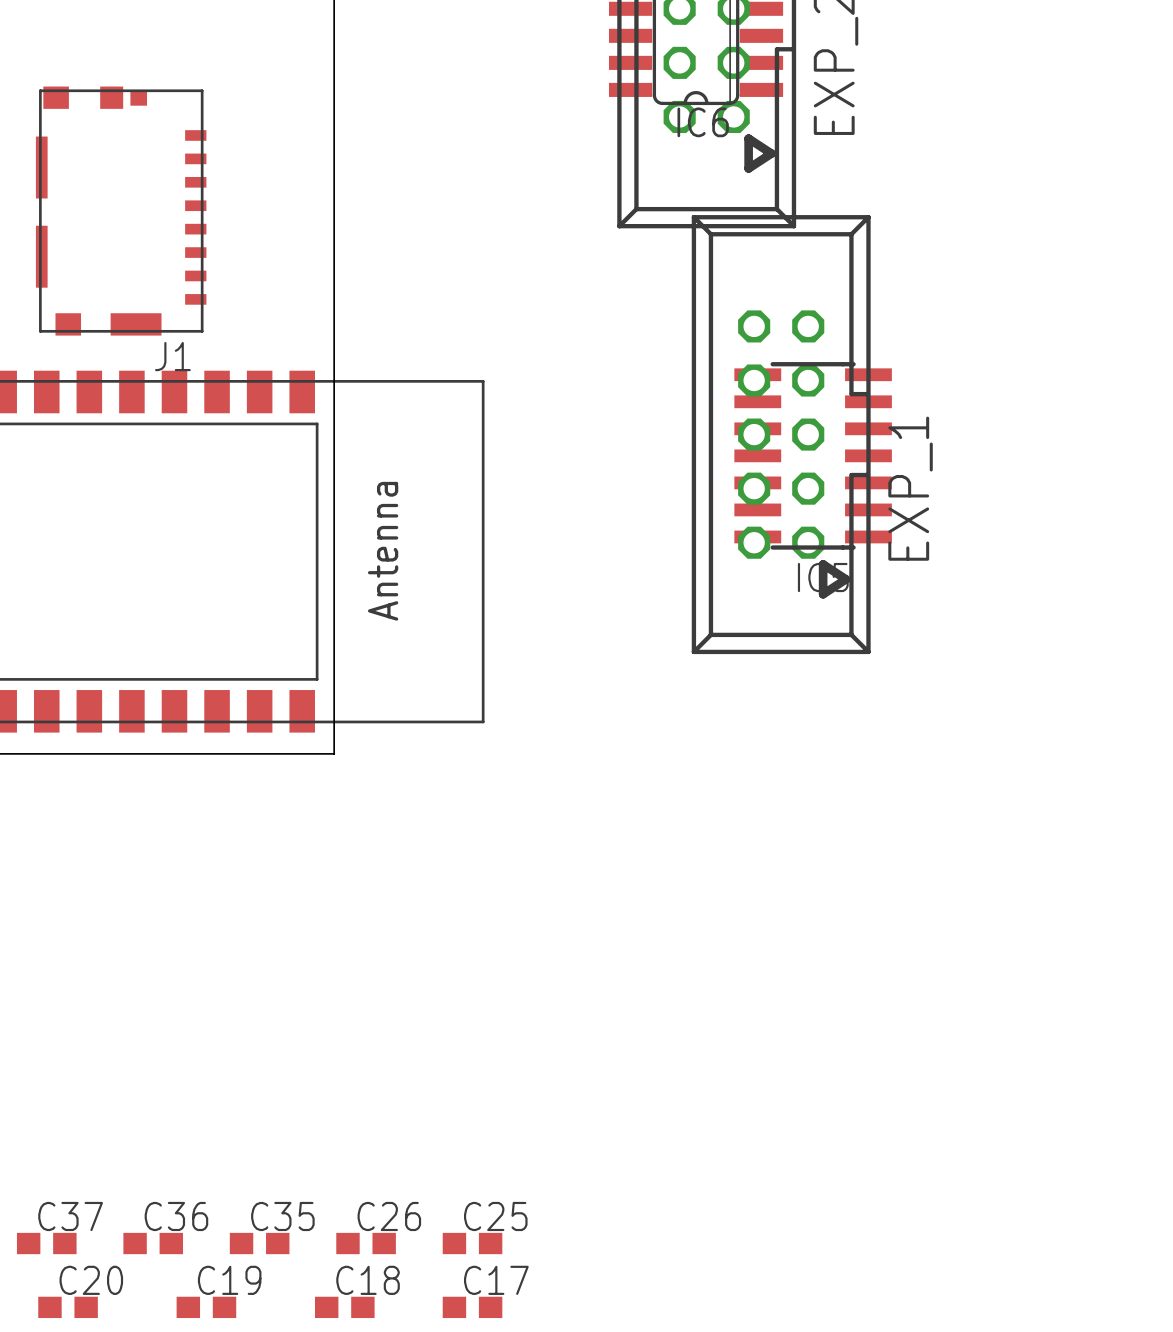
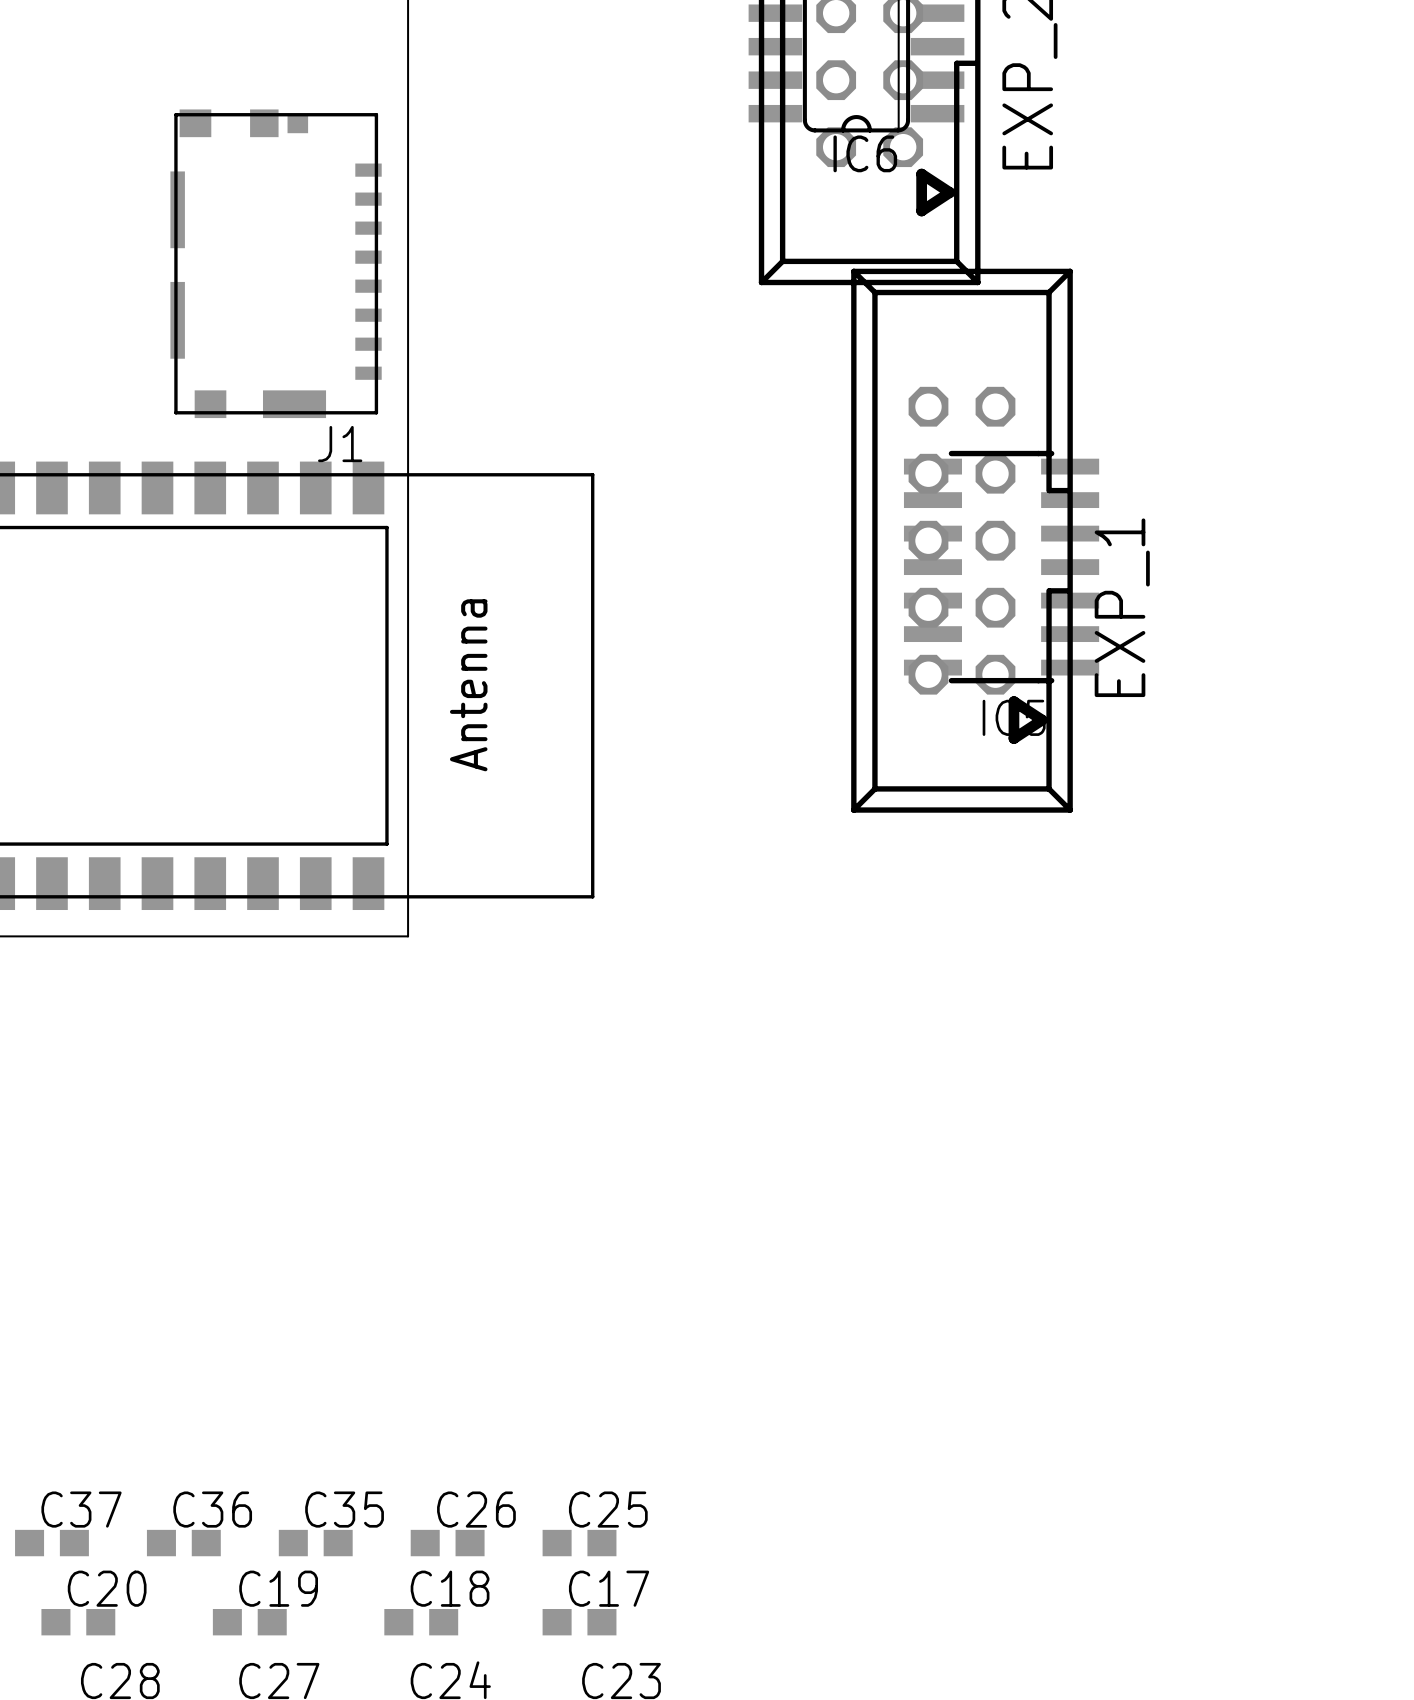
J1 position: (121, 211) -> (276, 263)

